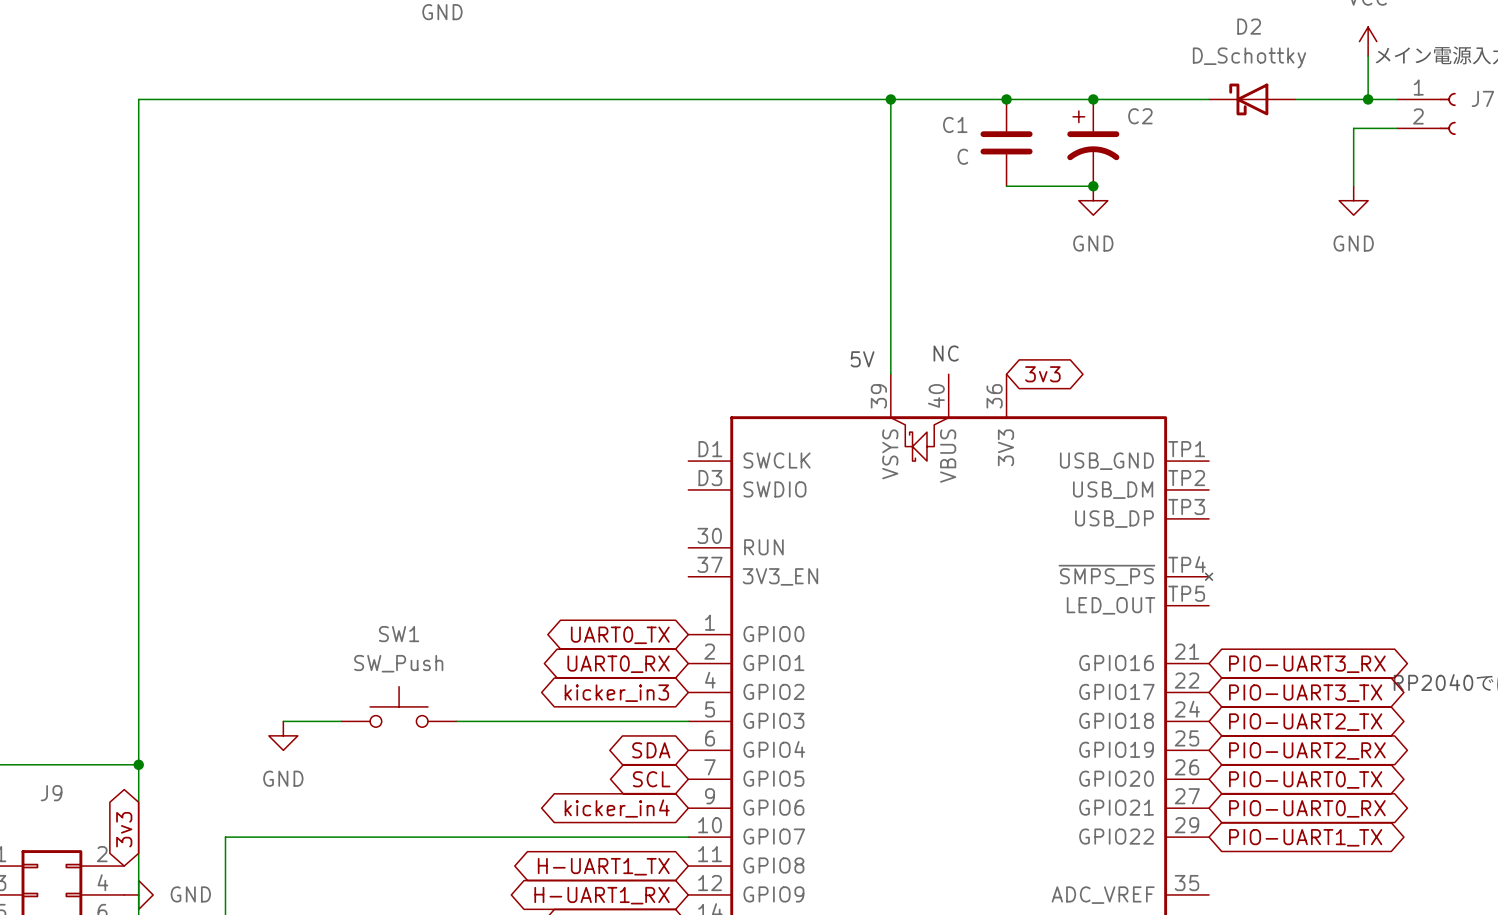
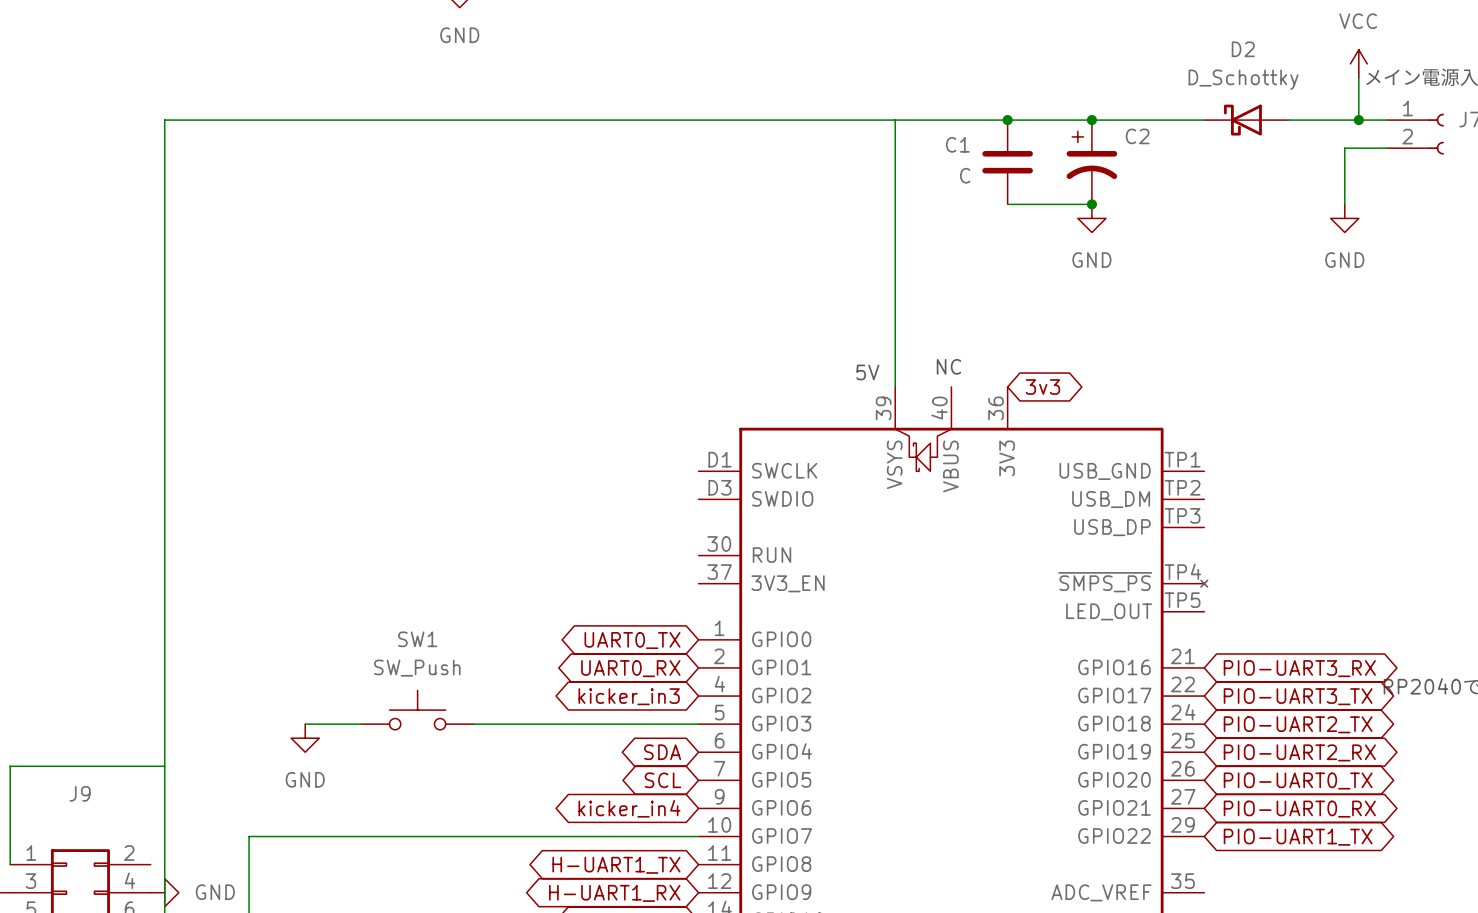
junction: (890, 99) -> none
junction: (138, 764) -> none
global label: 3v3 (124, 829) -> none

